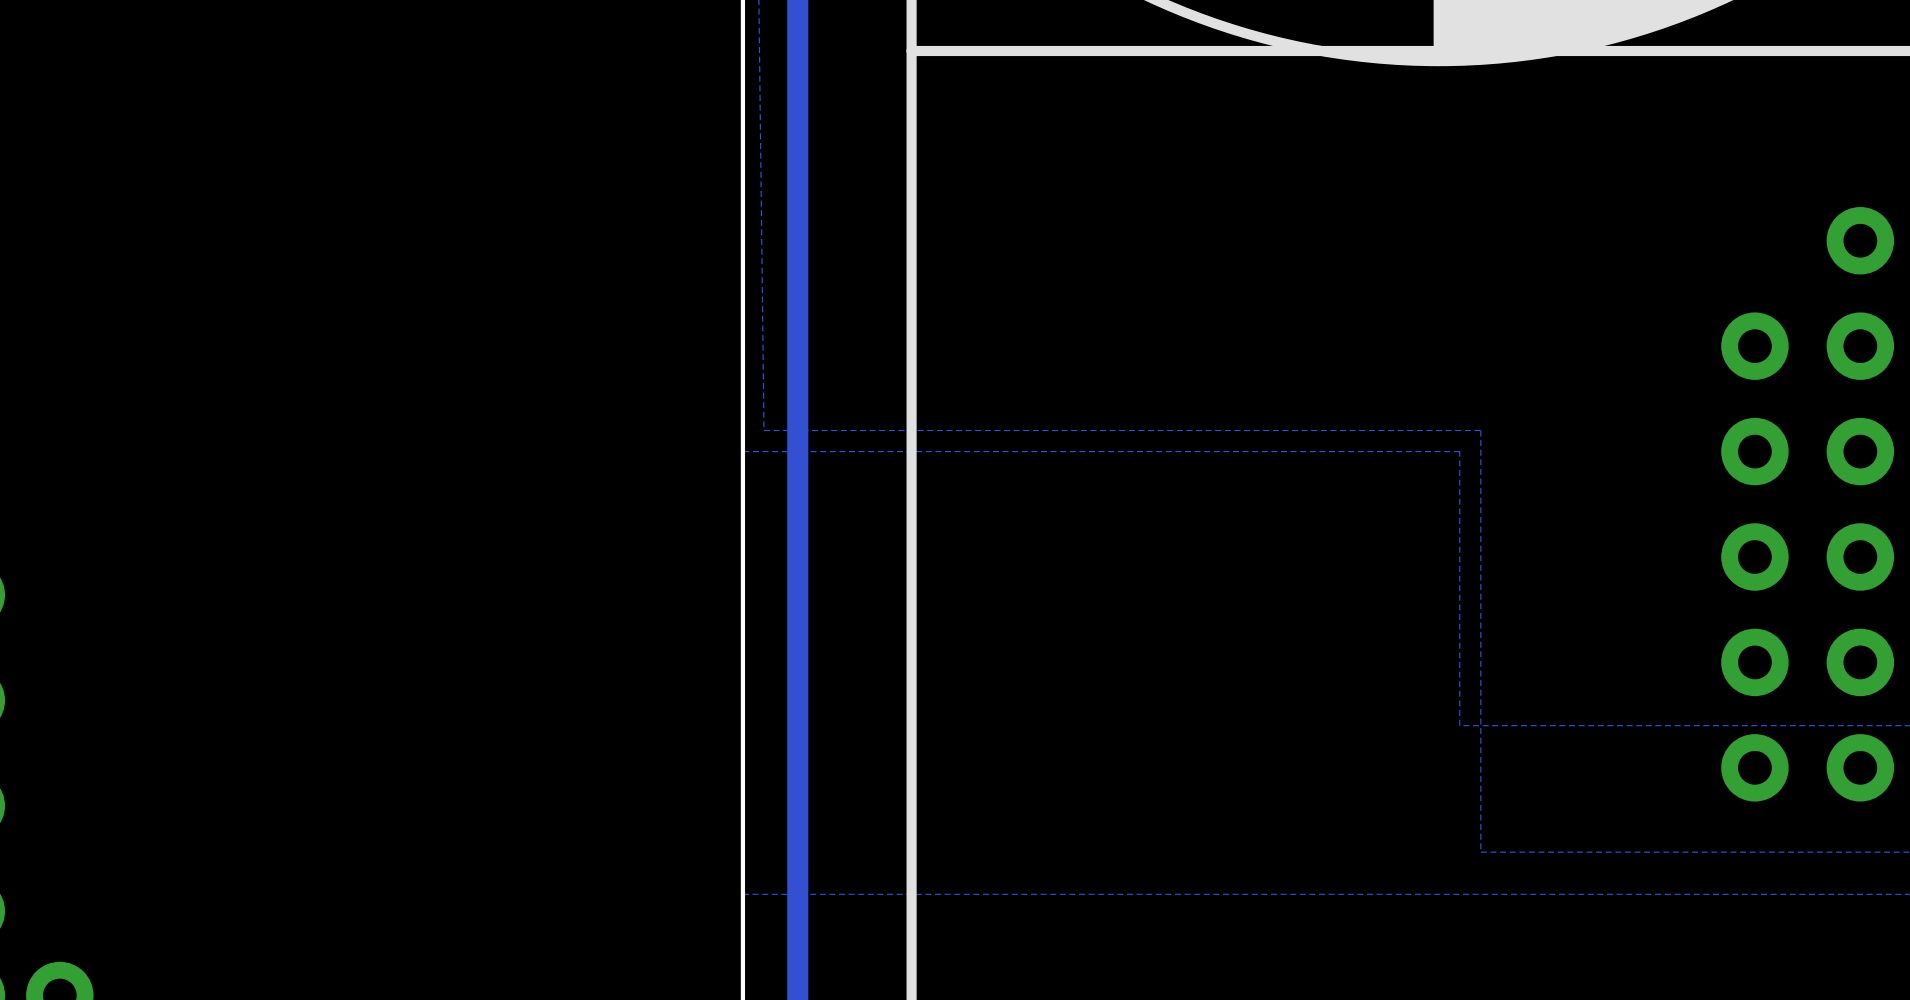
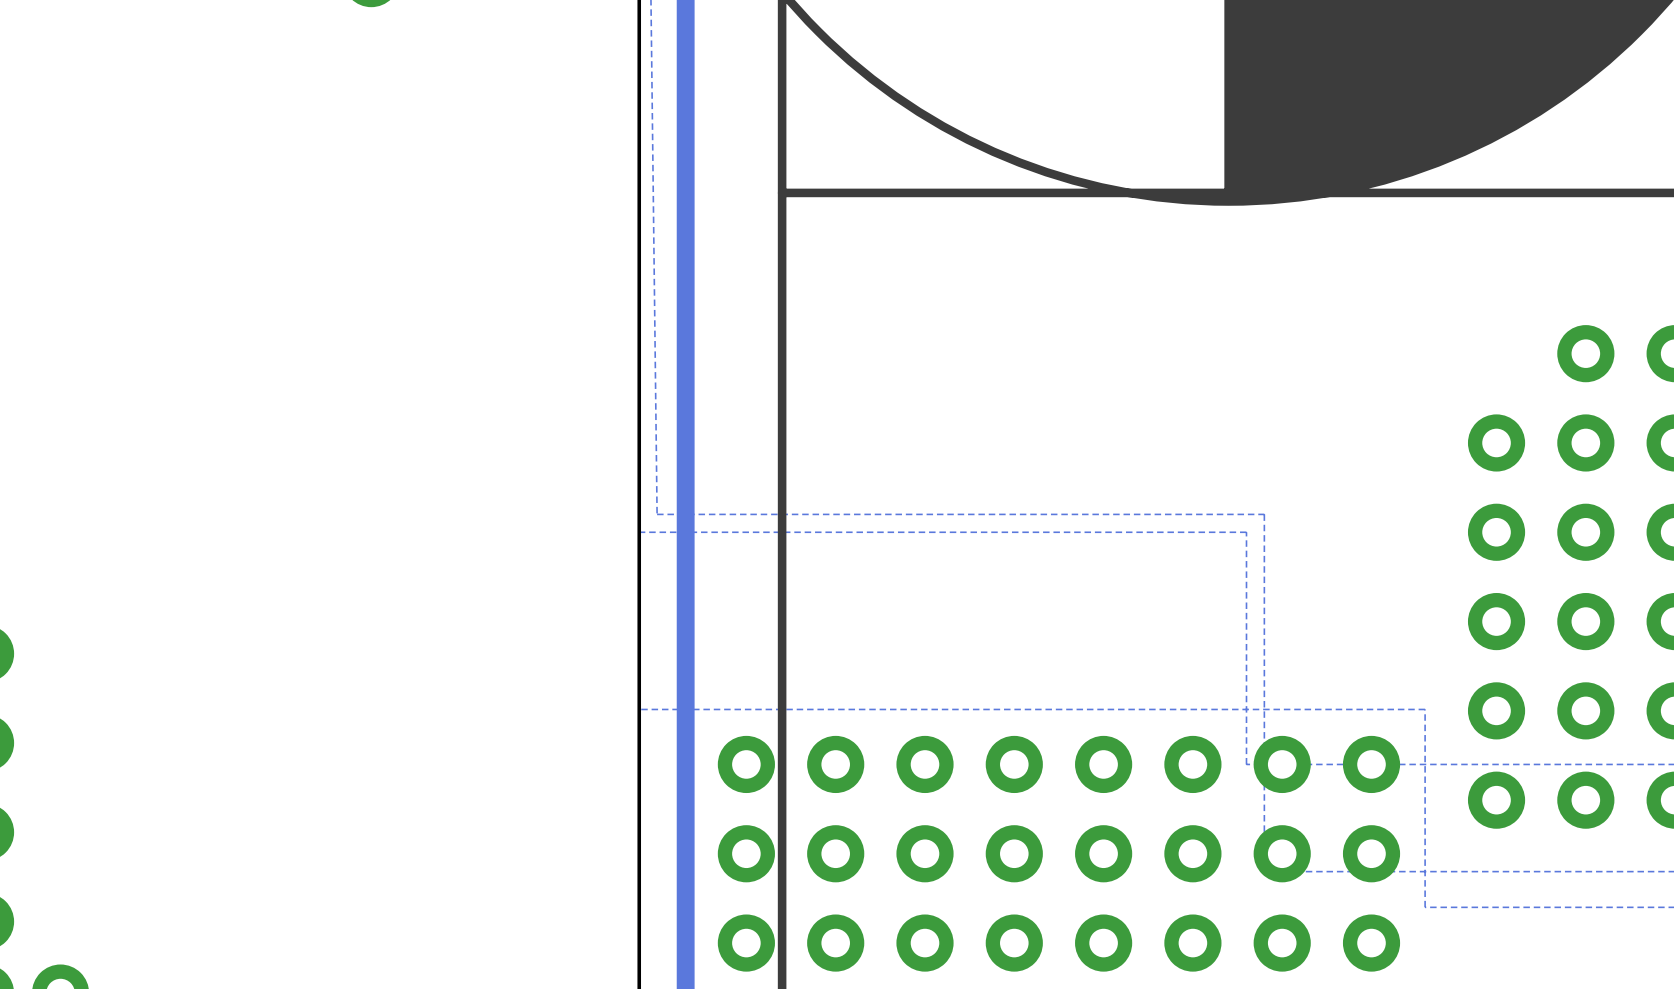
via: none -> (746, 764)
via: none -> (835, 764)
via: none -> (925, 764)
via: none -> (1014, 764)
via: none -> (1103, 764)
via: none -> (1192, 764)
via: none -> (1282, 764)
via: none -> (1371, 764)
via: none -> (746, 853)
via: none -> (835, 853)
via: none -> (925, 853)
via: none -> (1014, 853)
via: none -> (1103, 853)
via: none -> (1192, 853)
via: none -> (1282, 853)
via: none -> (1371, 853)
zone outline: (1670, 894) (742, 894) -> (1425, 907) (1425, 709) (639, 709)
via: none -> (746, 943)
via: none -> (835, 943)
via: none -> (925, 943)
via: none -> (1014, 943)
via: none -> (1103, 943)
via: none -> (1192, 943)
via: none -> (1282, 943)
via: none -> (1371, 943)

